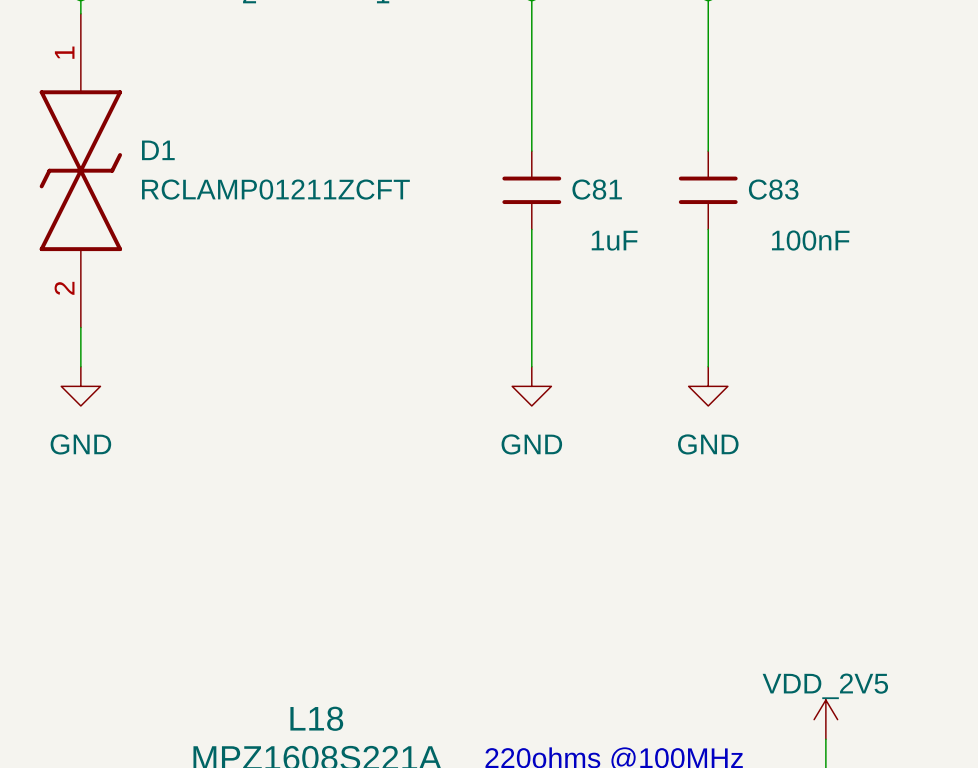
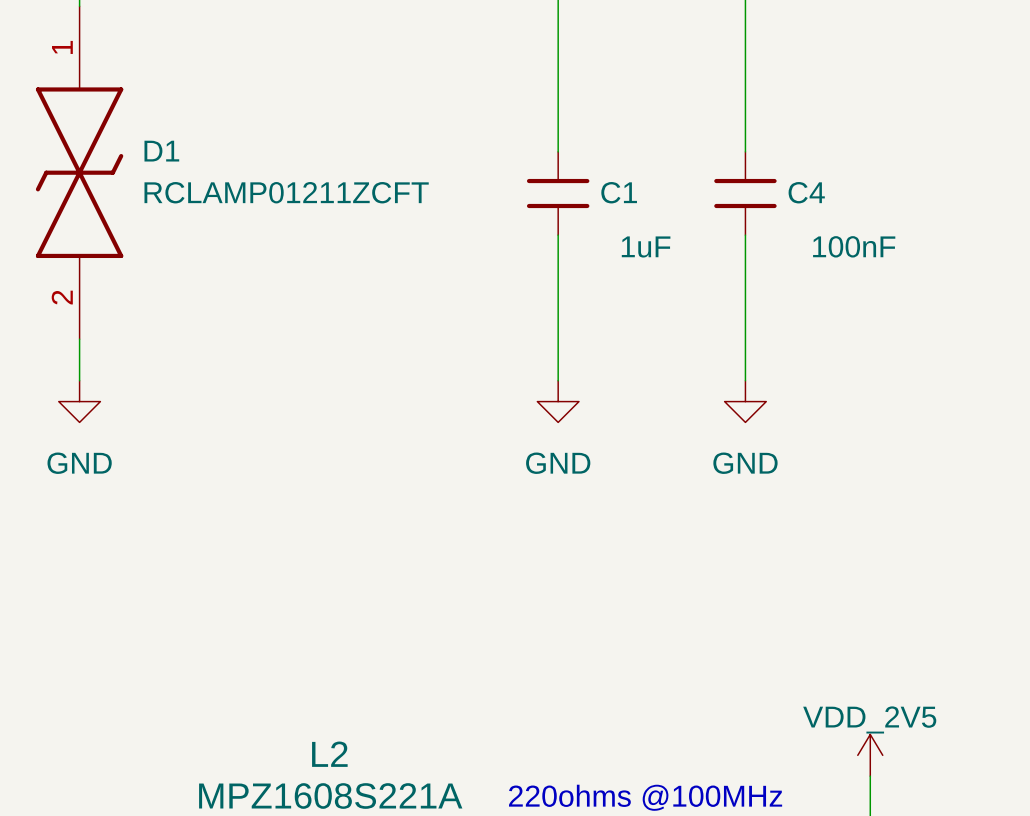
C81 name: C81 (597, 189) -> C1 (619, 192)
C83 name: C83 (773, 189) -> C4 (806, 192)
L18 name: L18 (316, 718) -> L2 (329, 754)

